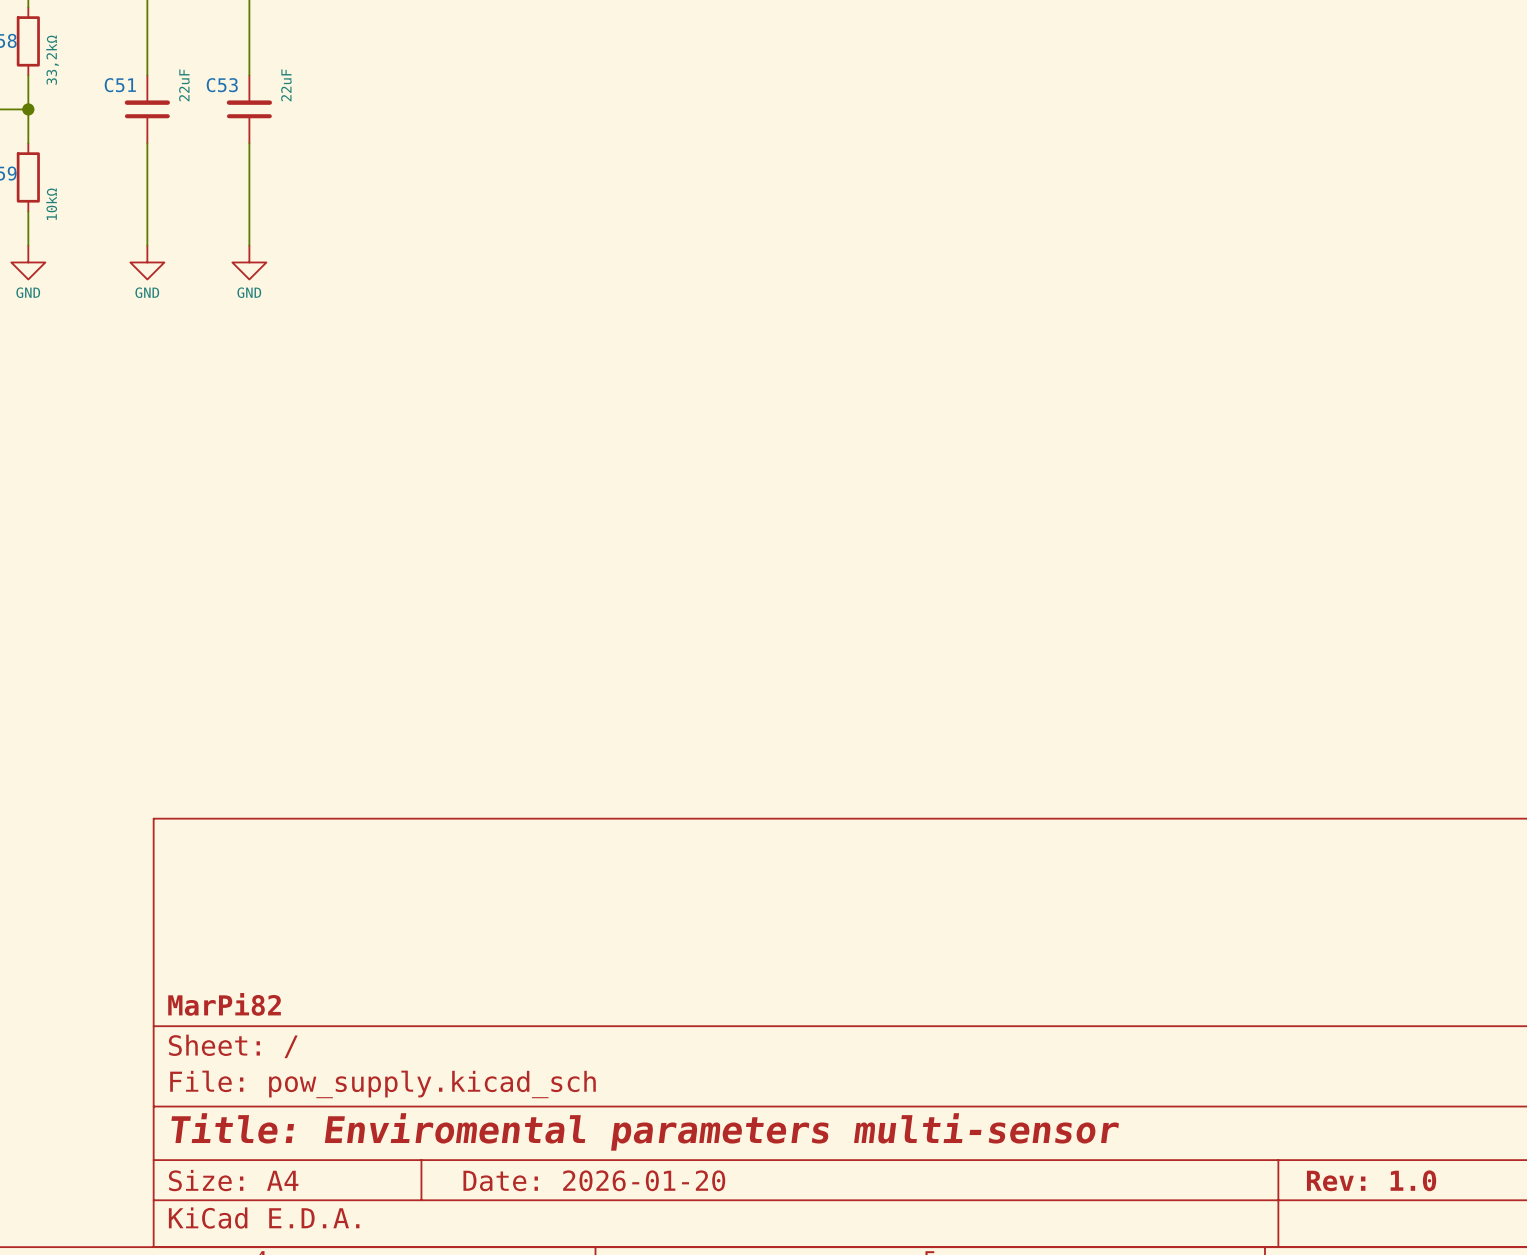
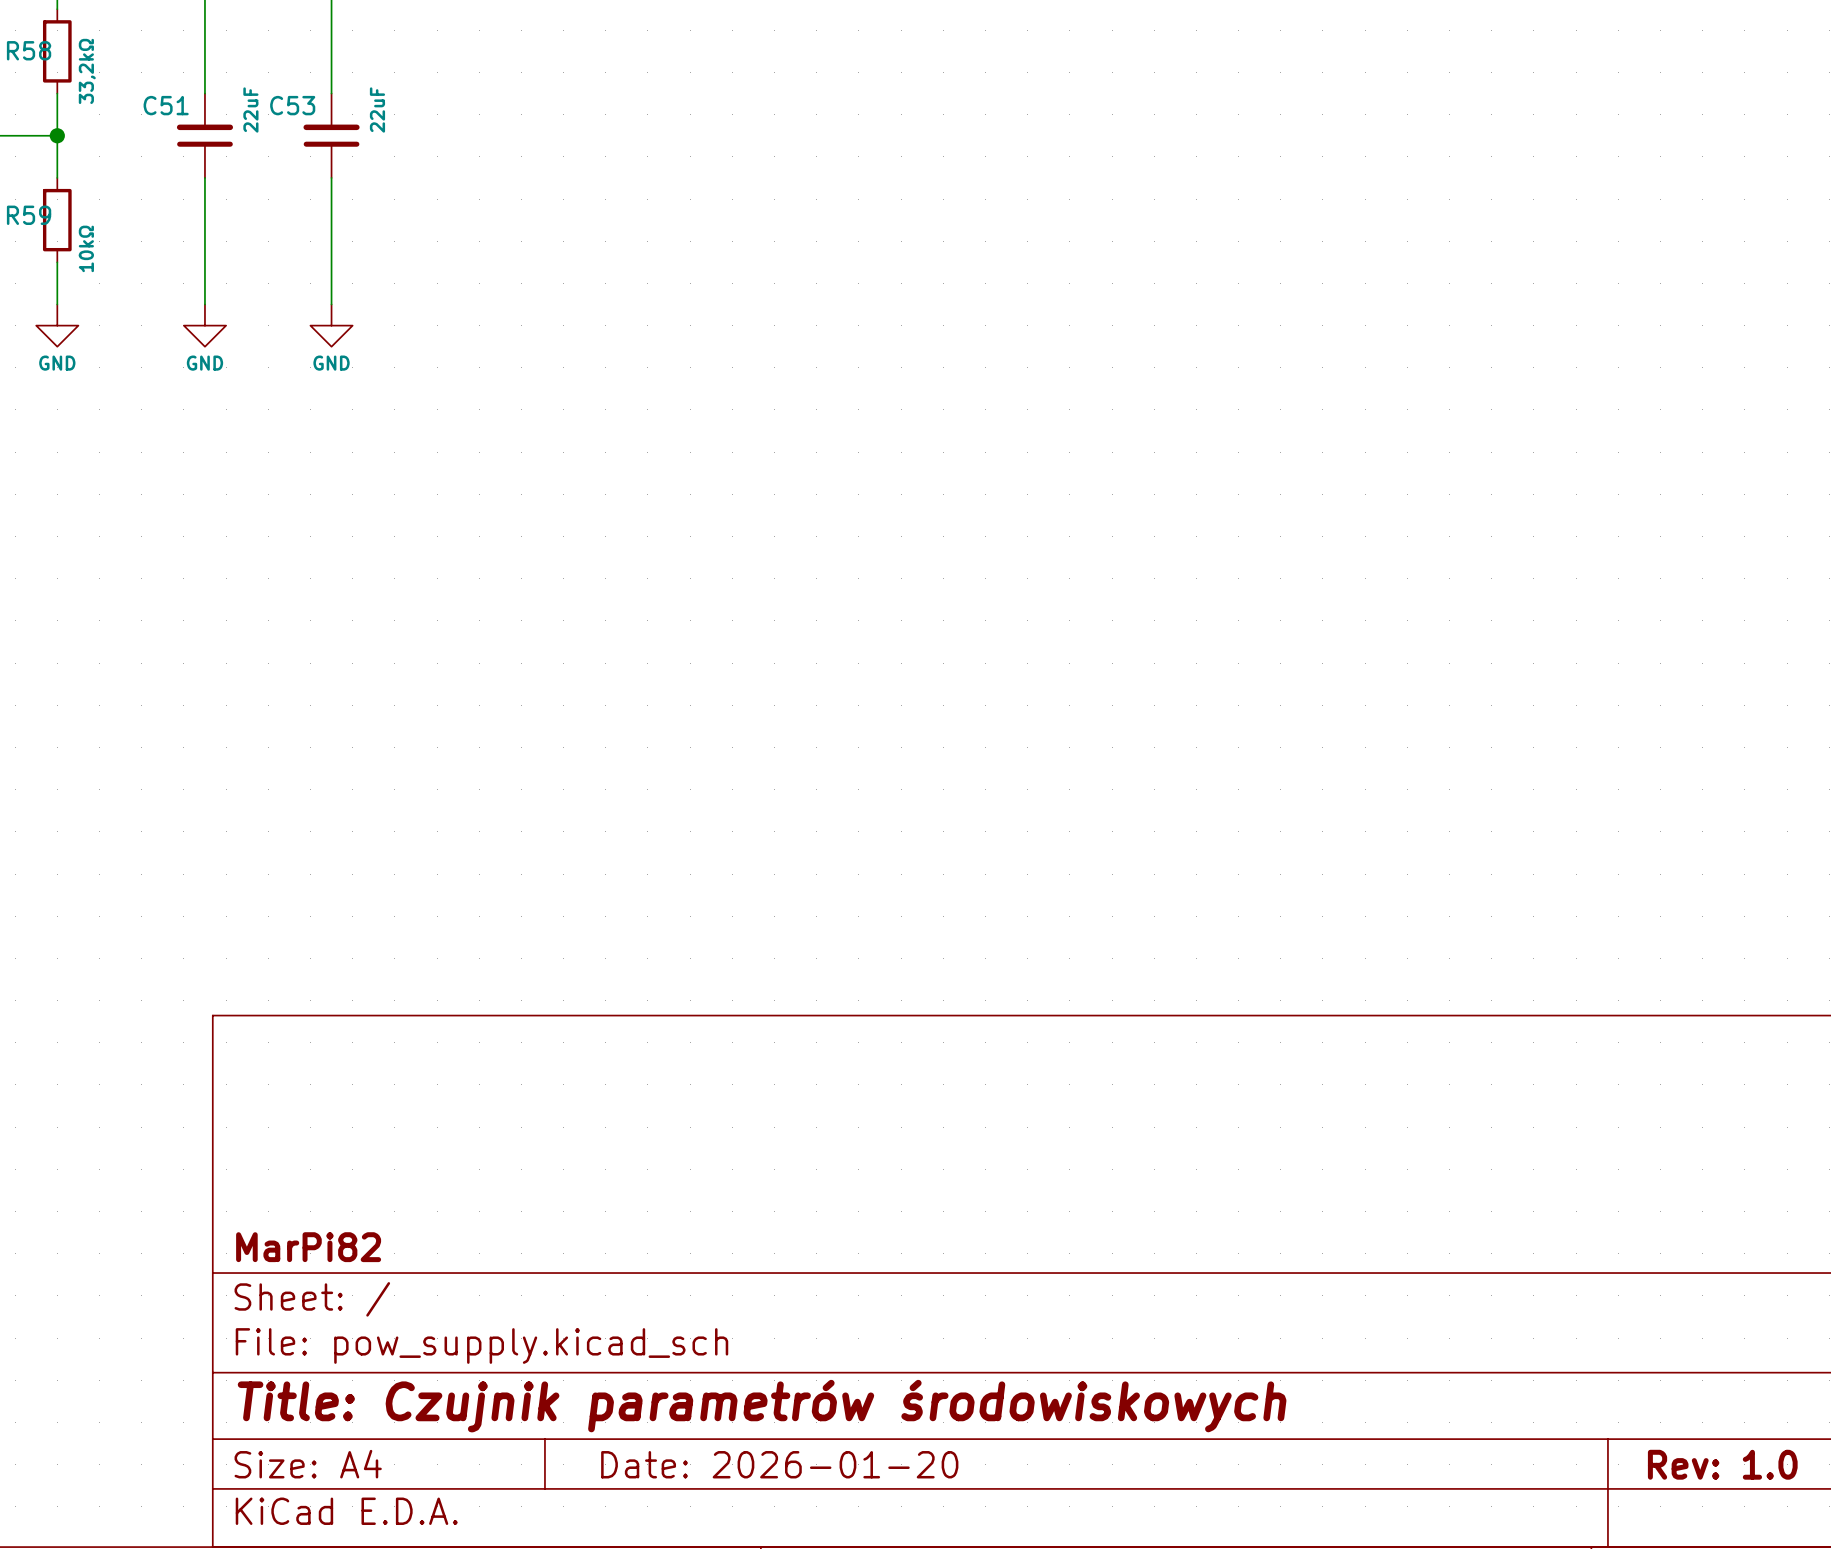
title block: Title: Enviromental parameters multi-sensor (645, 1131) -> Title: Czujnik parametrów środowiskowych (762, 1406)

